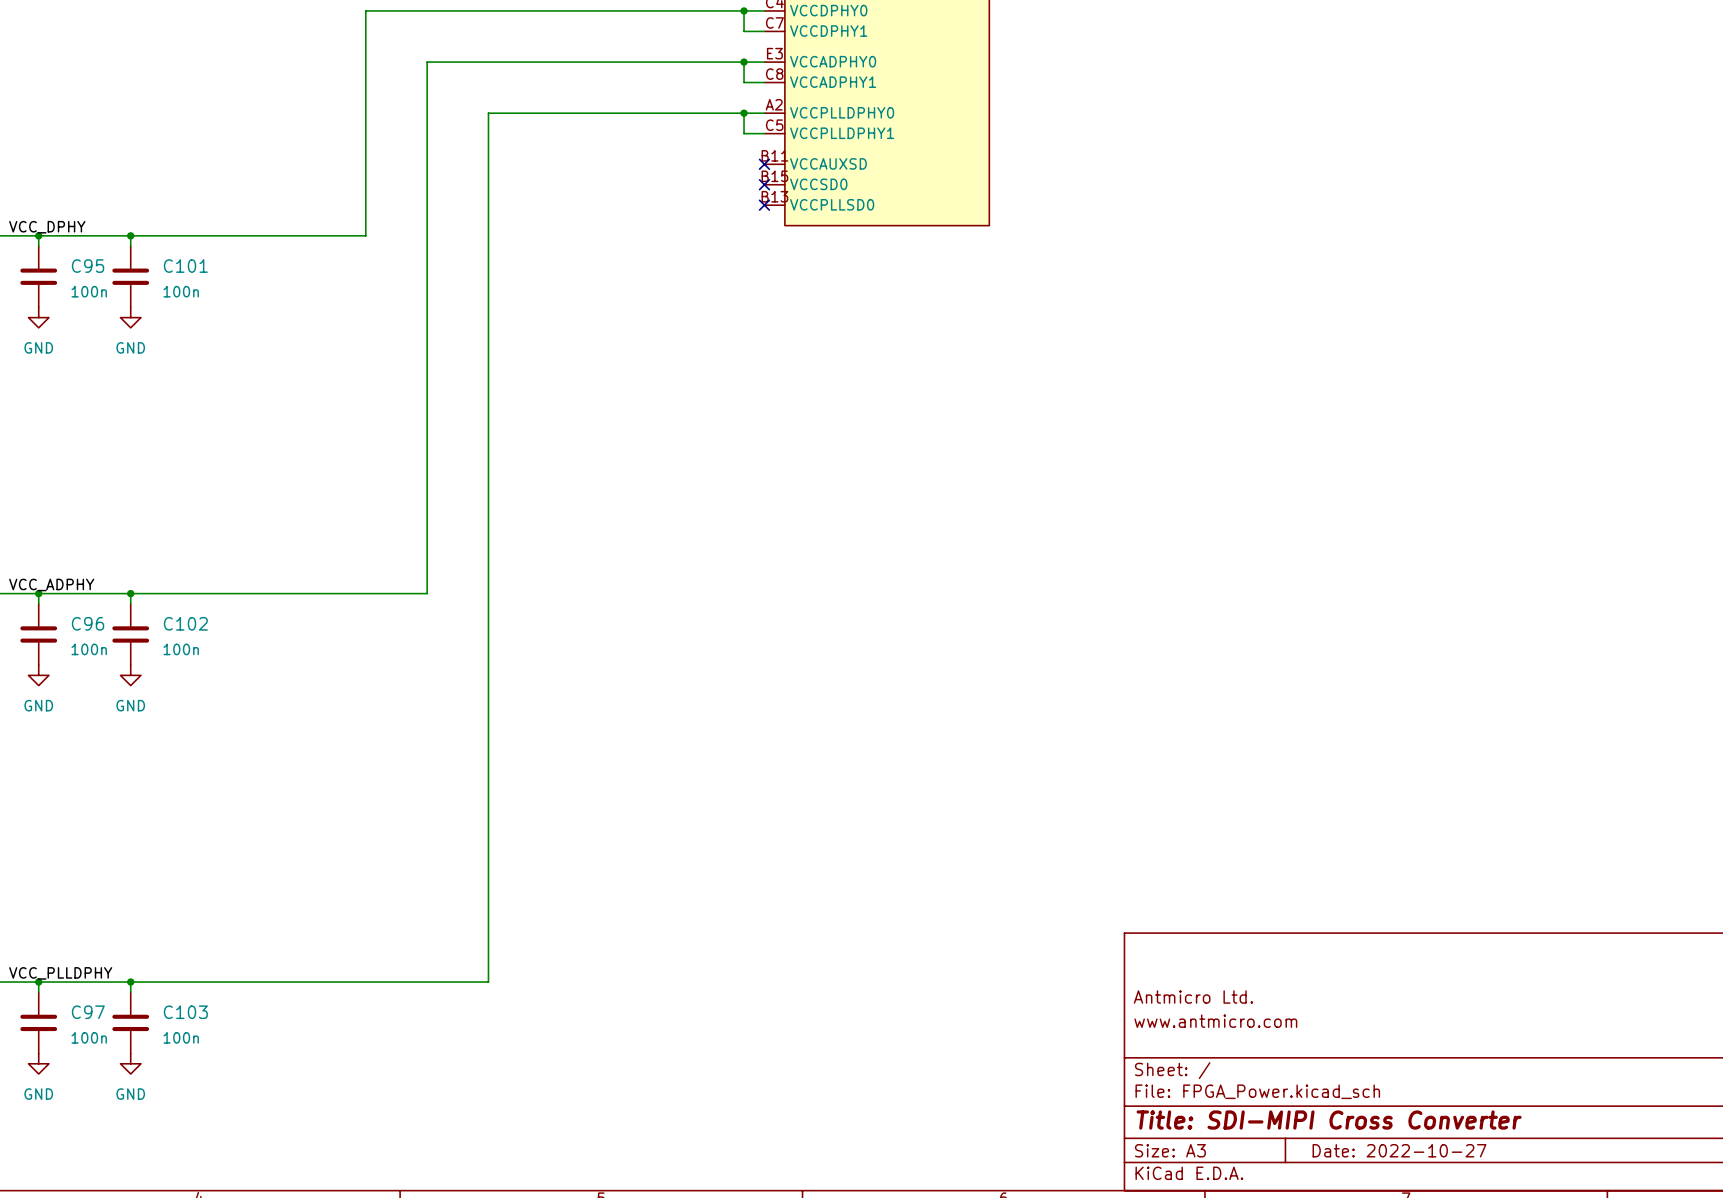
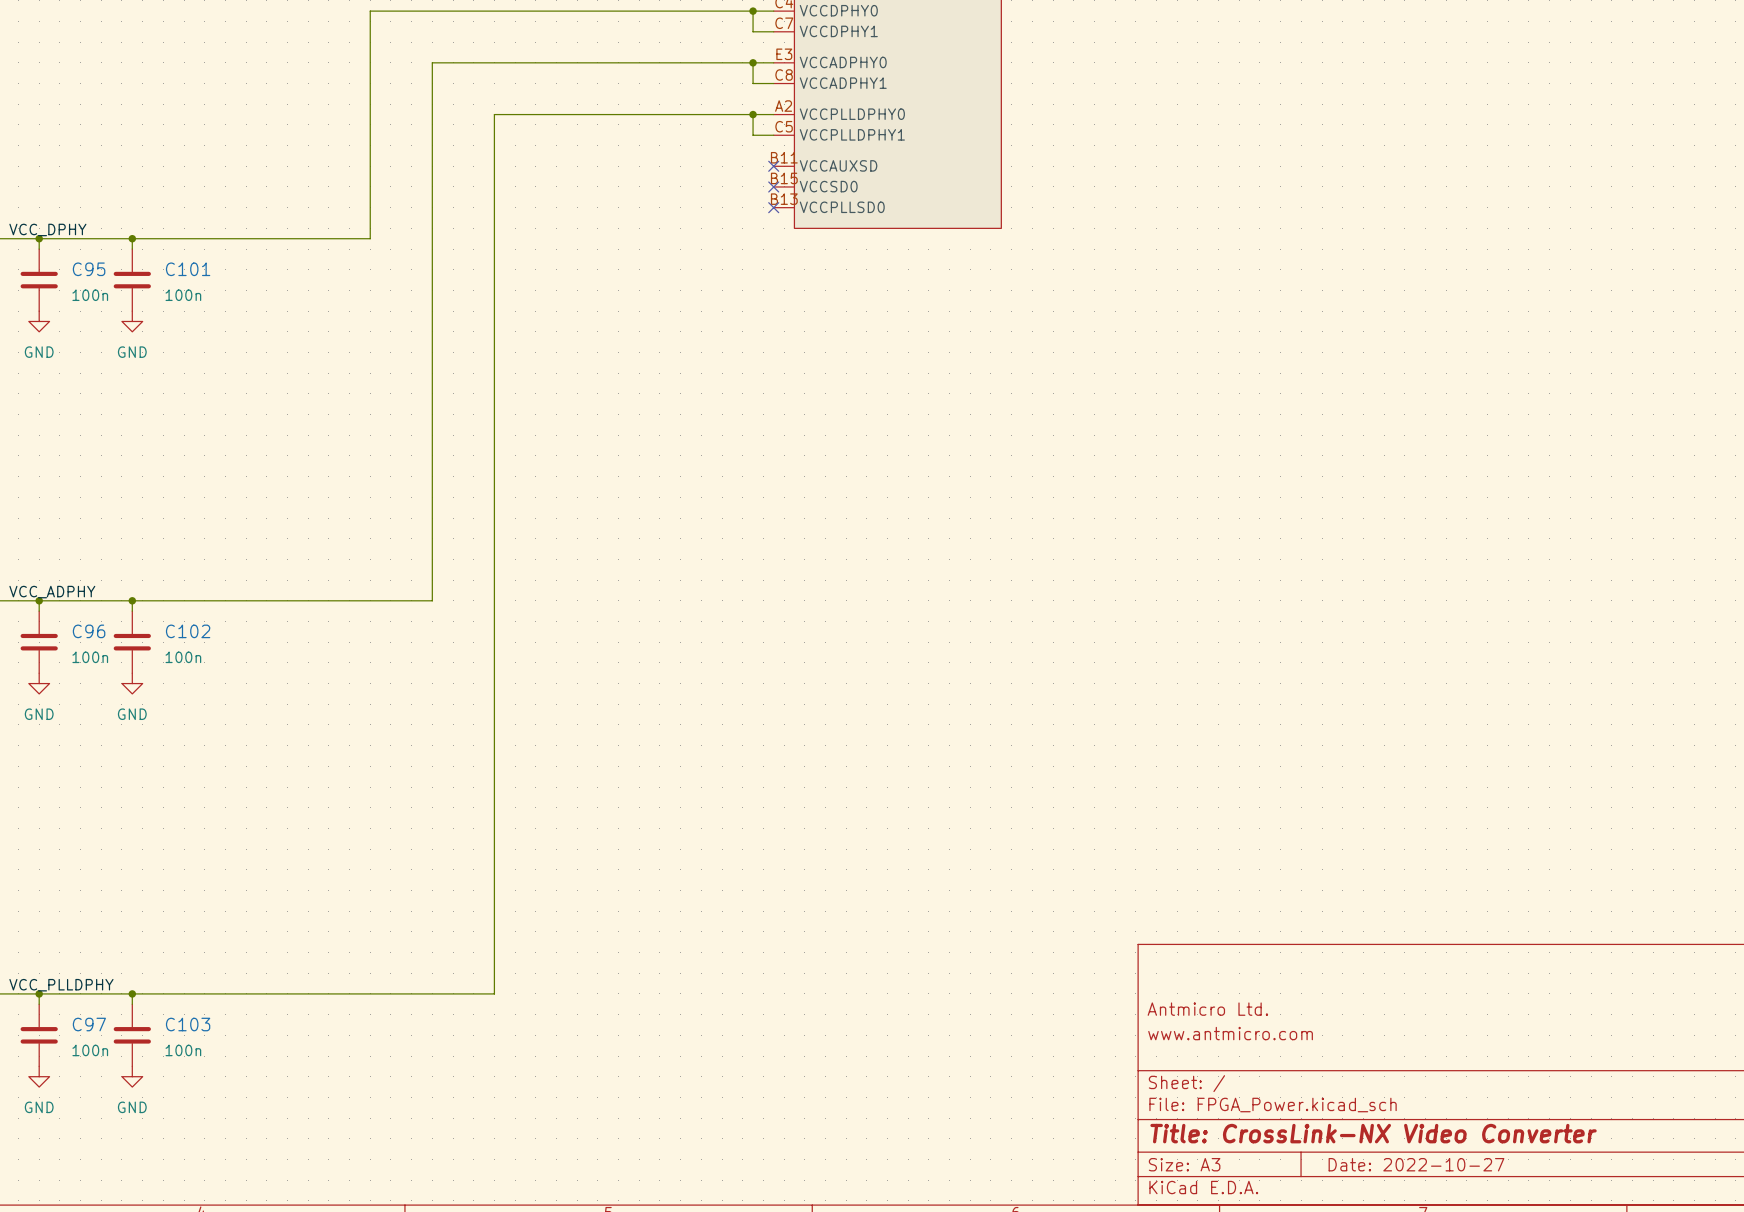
title block: Title: SDI-MIPI Cross Converter (1329, 1120) -> Title: CrossLink-NX Video Converter (1373, 1133)

